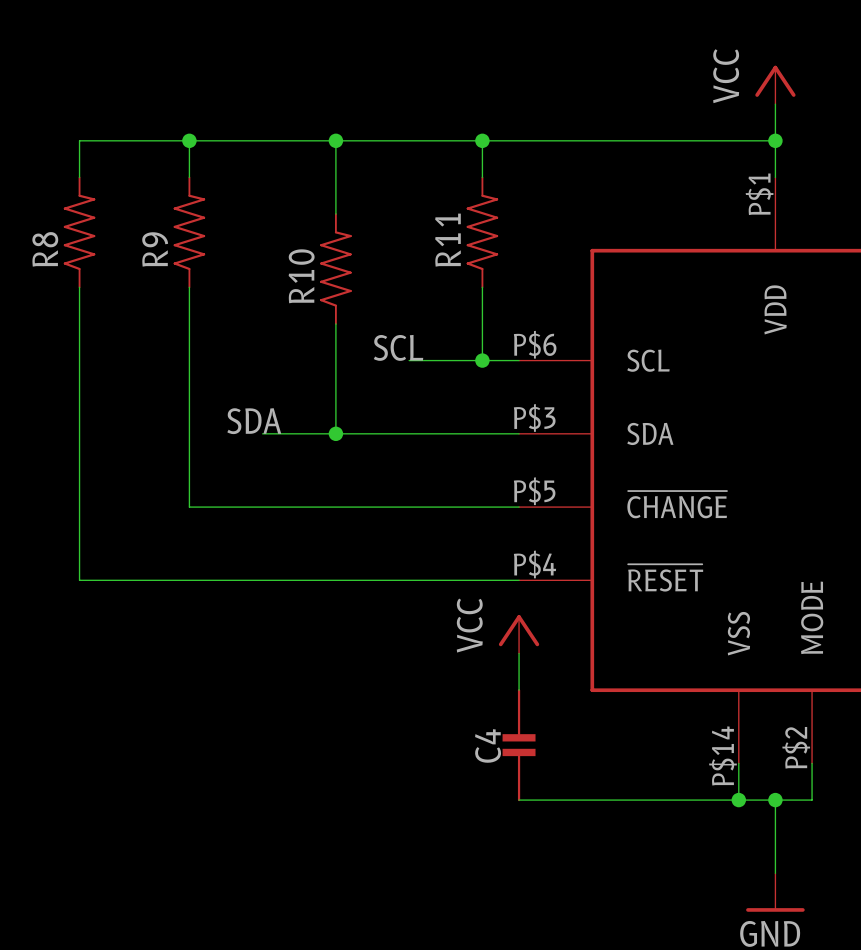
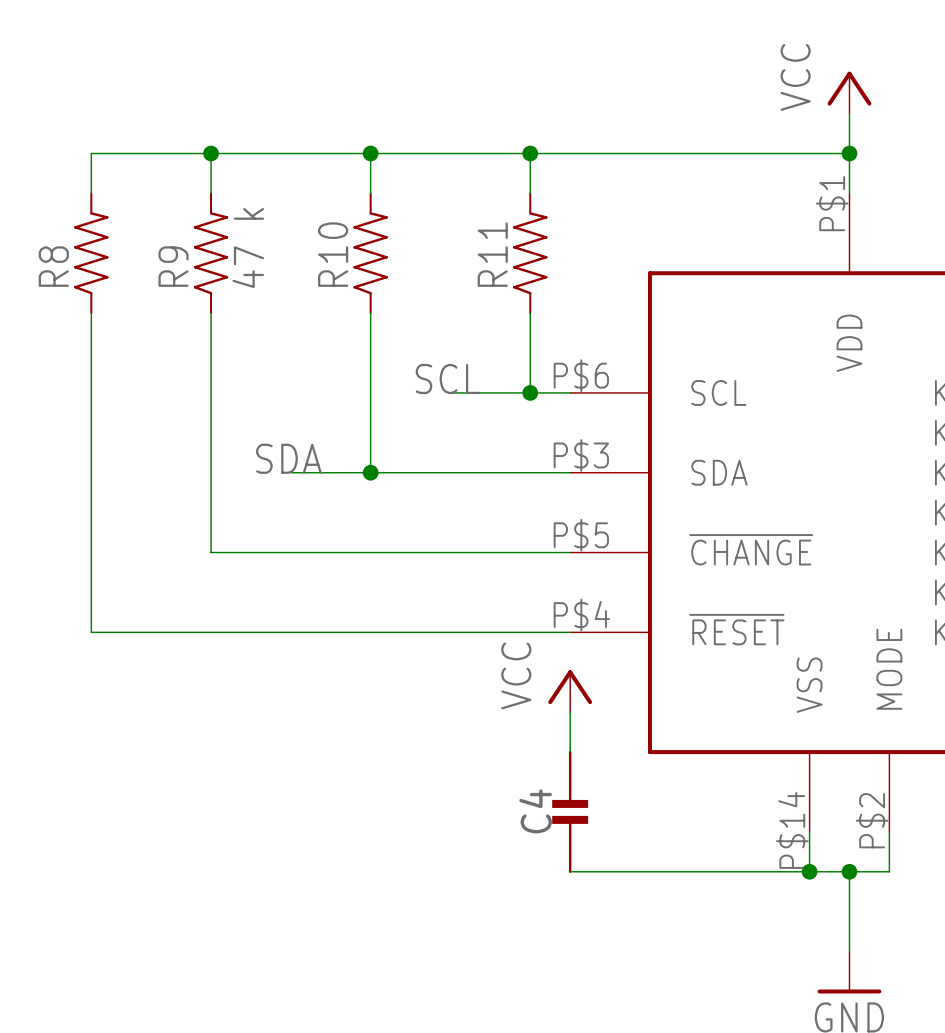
R9 value: none -> 47 k (248, 248)
R10 position: (335, 269) -> (370, 253)

